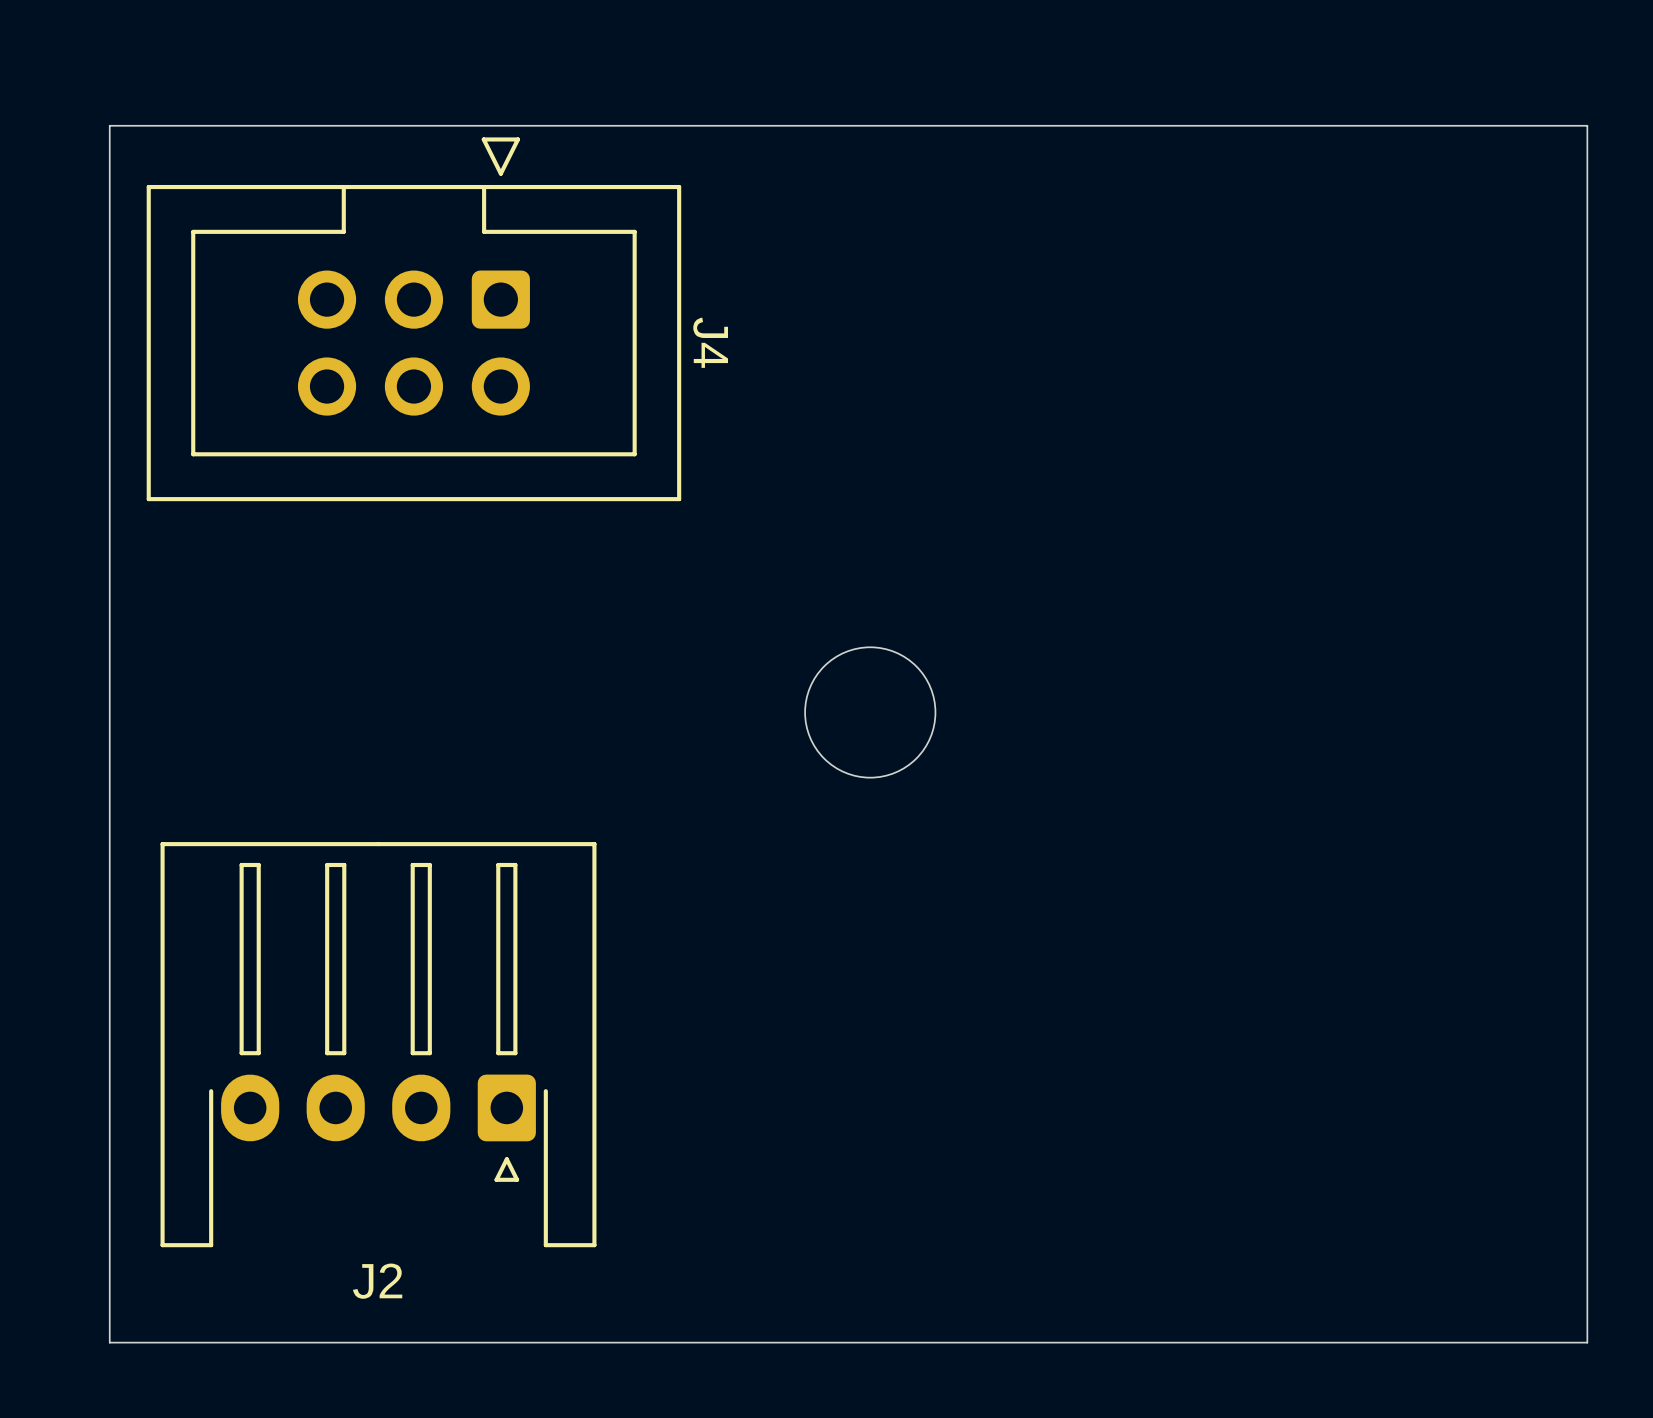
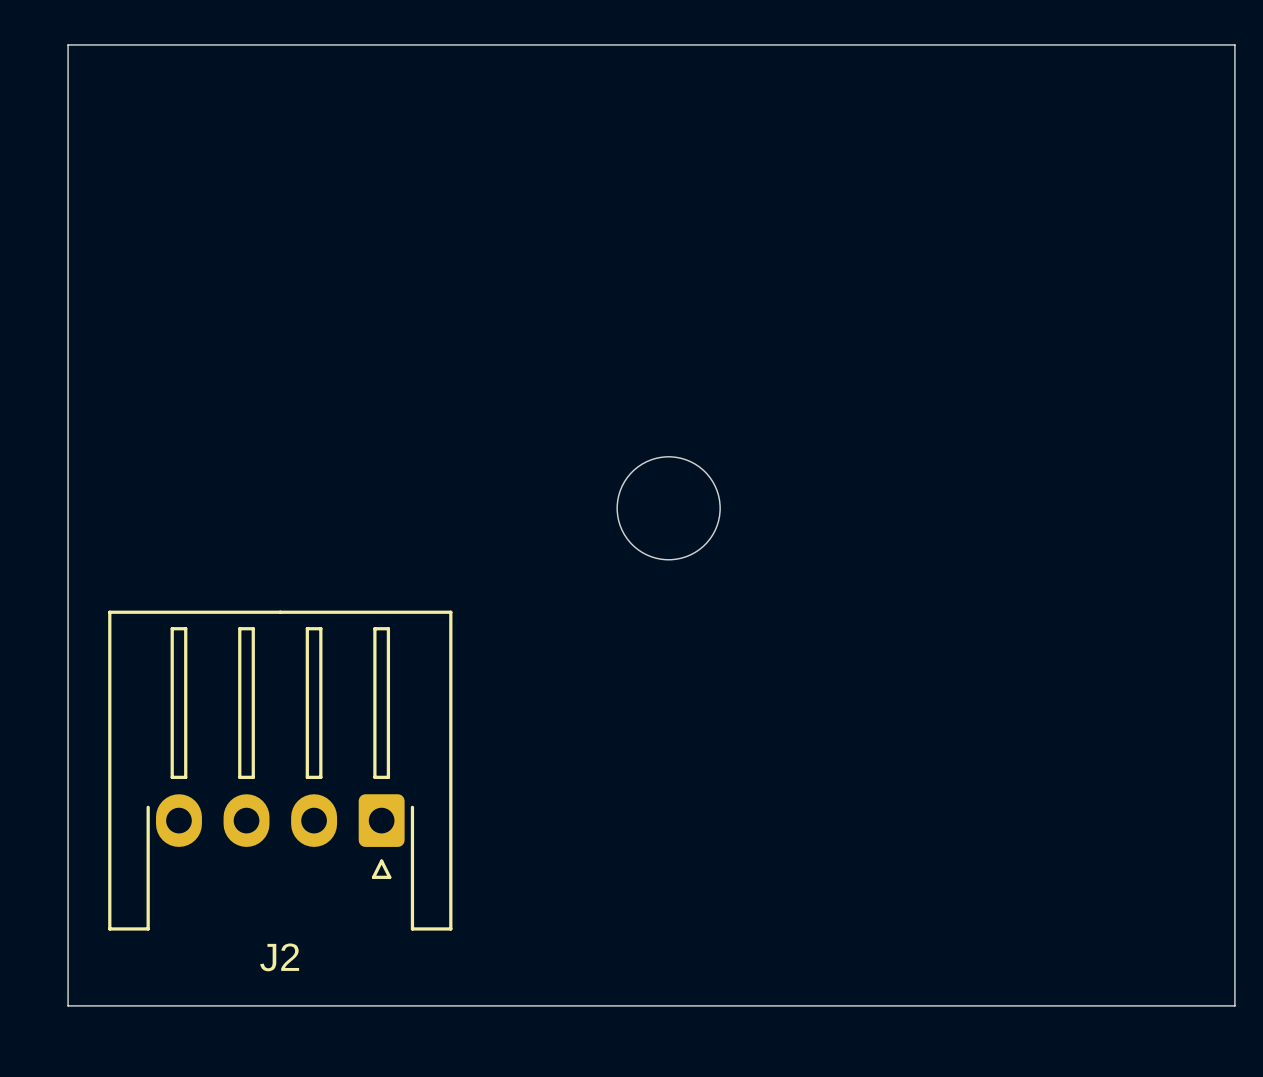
J4: (413, 319) -> none

